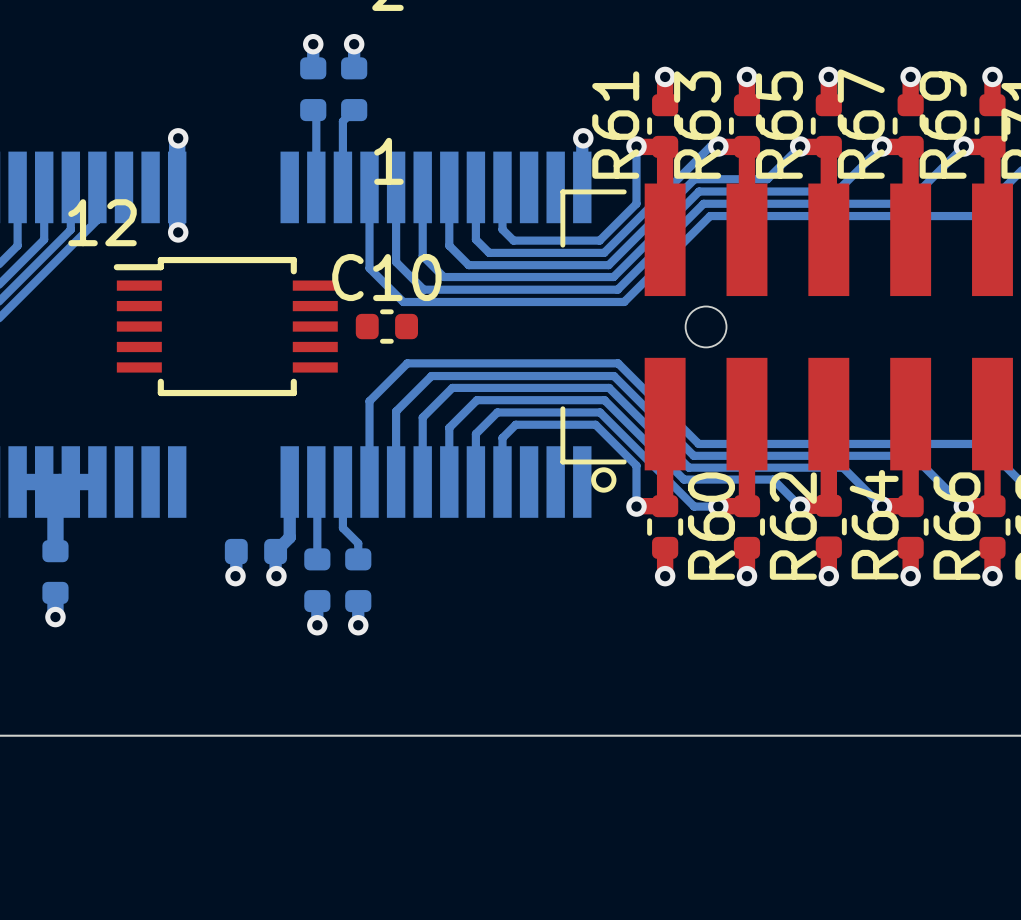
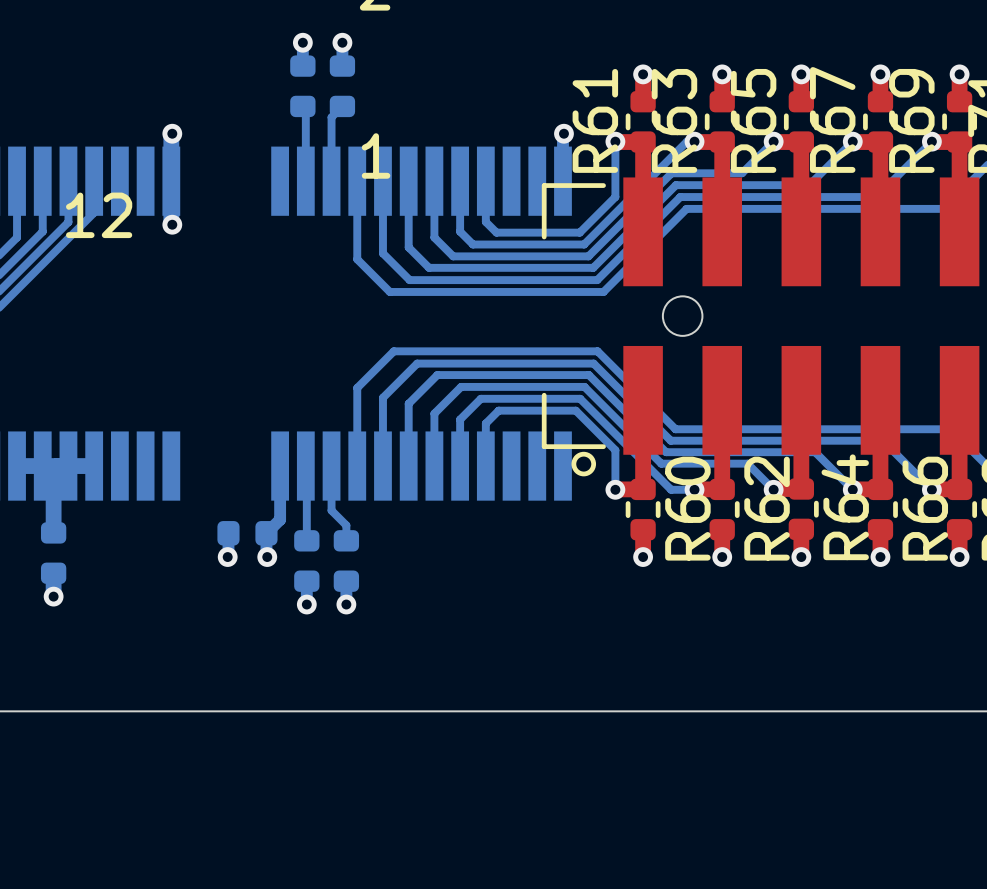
part: (225, 326) -> none
C10: (386, 326) -> none

